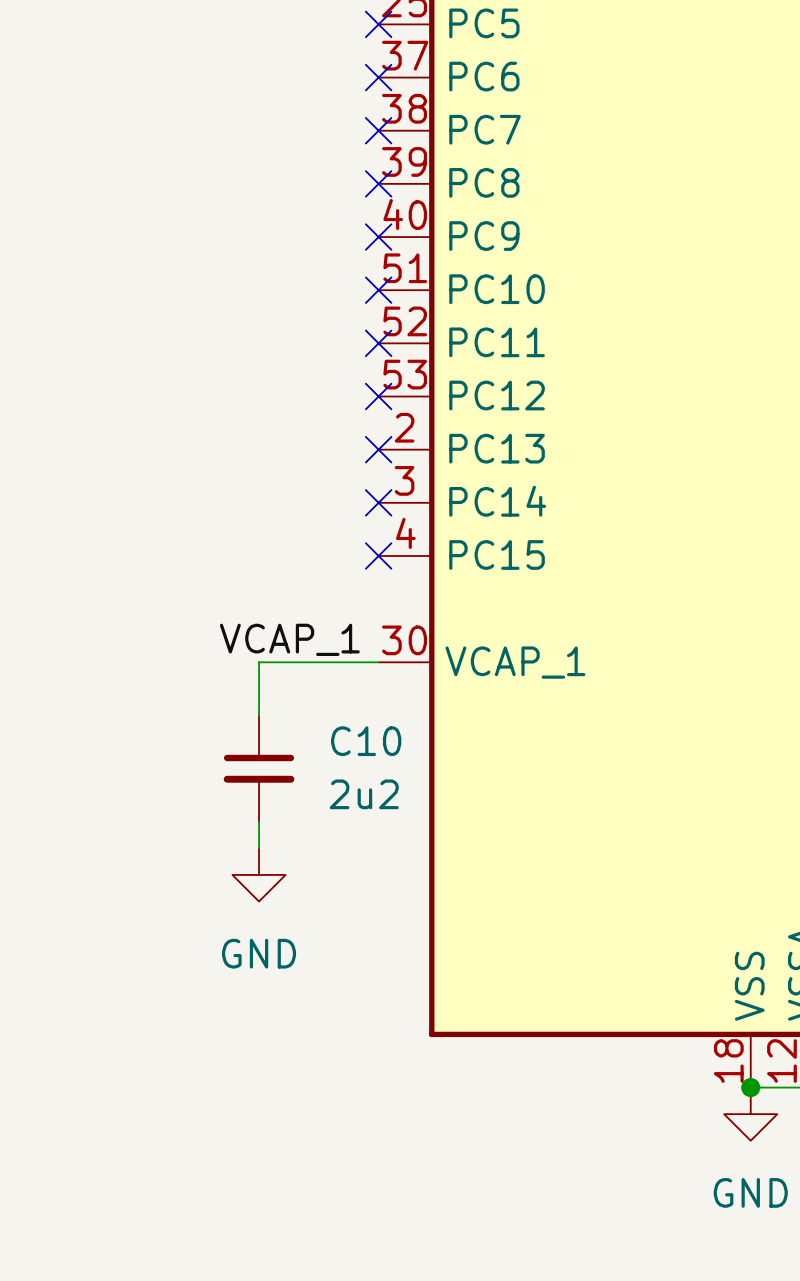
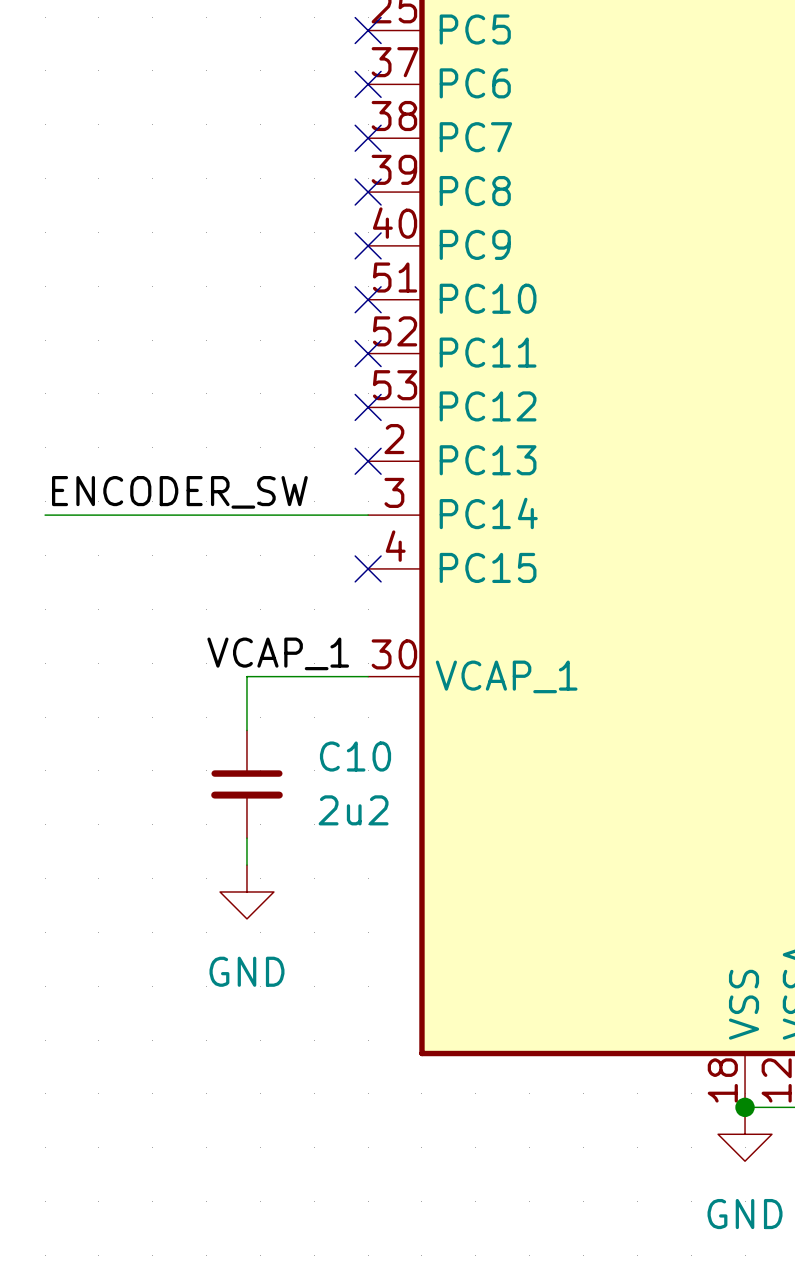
label: none -> ENCODER_SW (179, 492)
wire: none -> (45, 515) (368, 515)
no-connect mark: (378, 502) -> none

